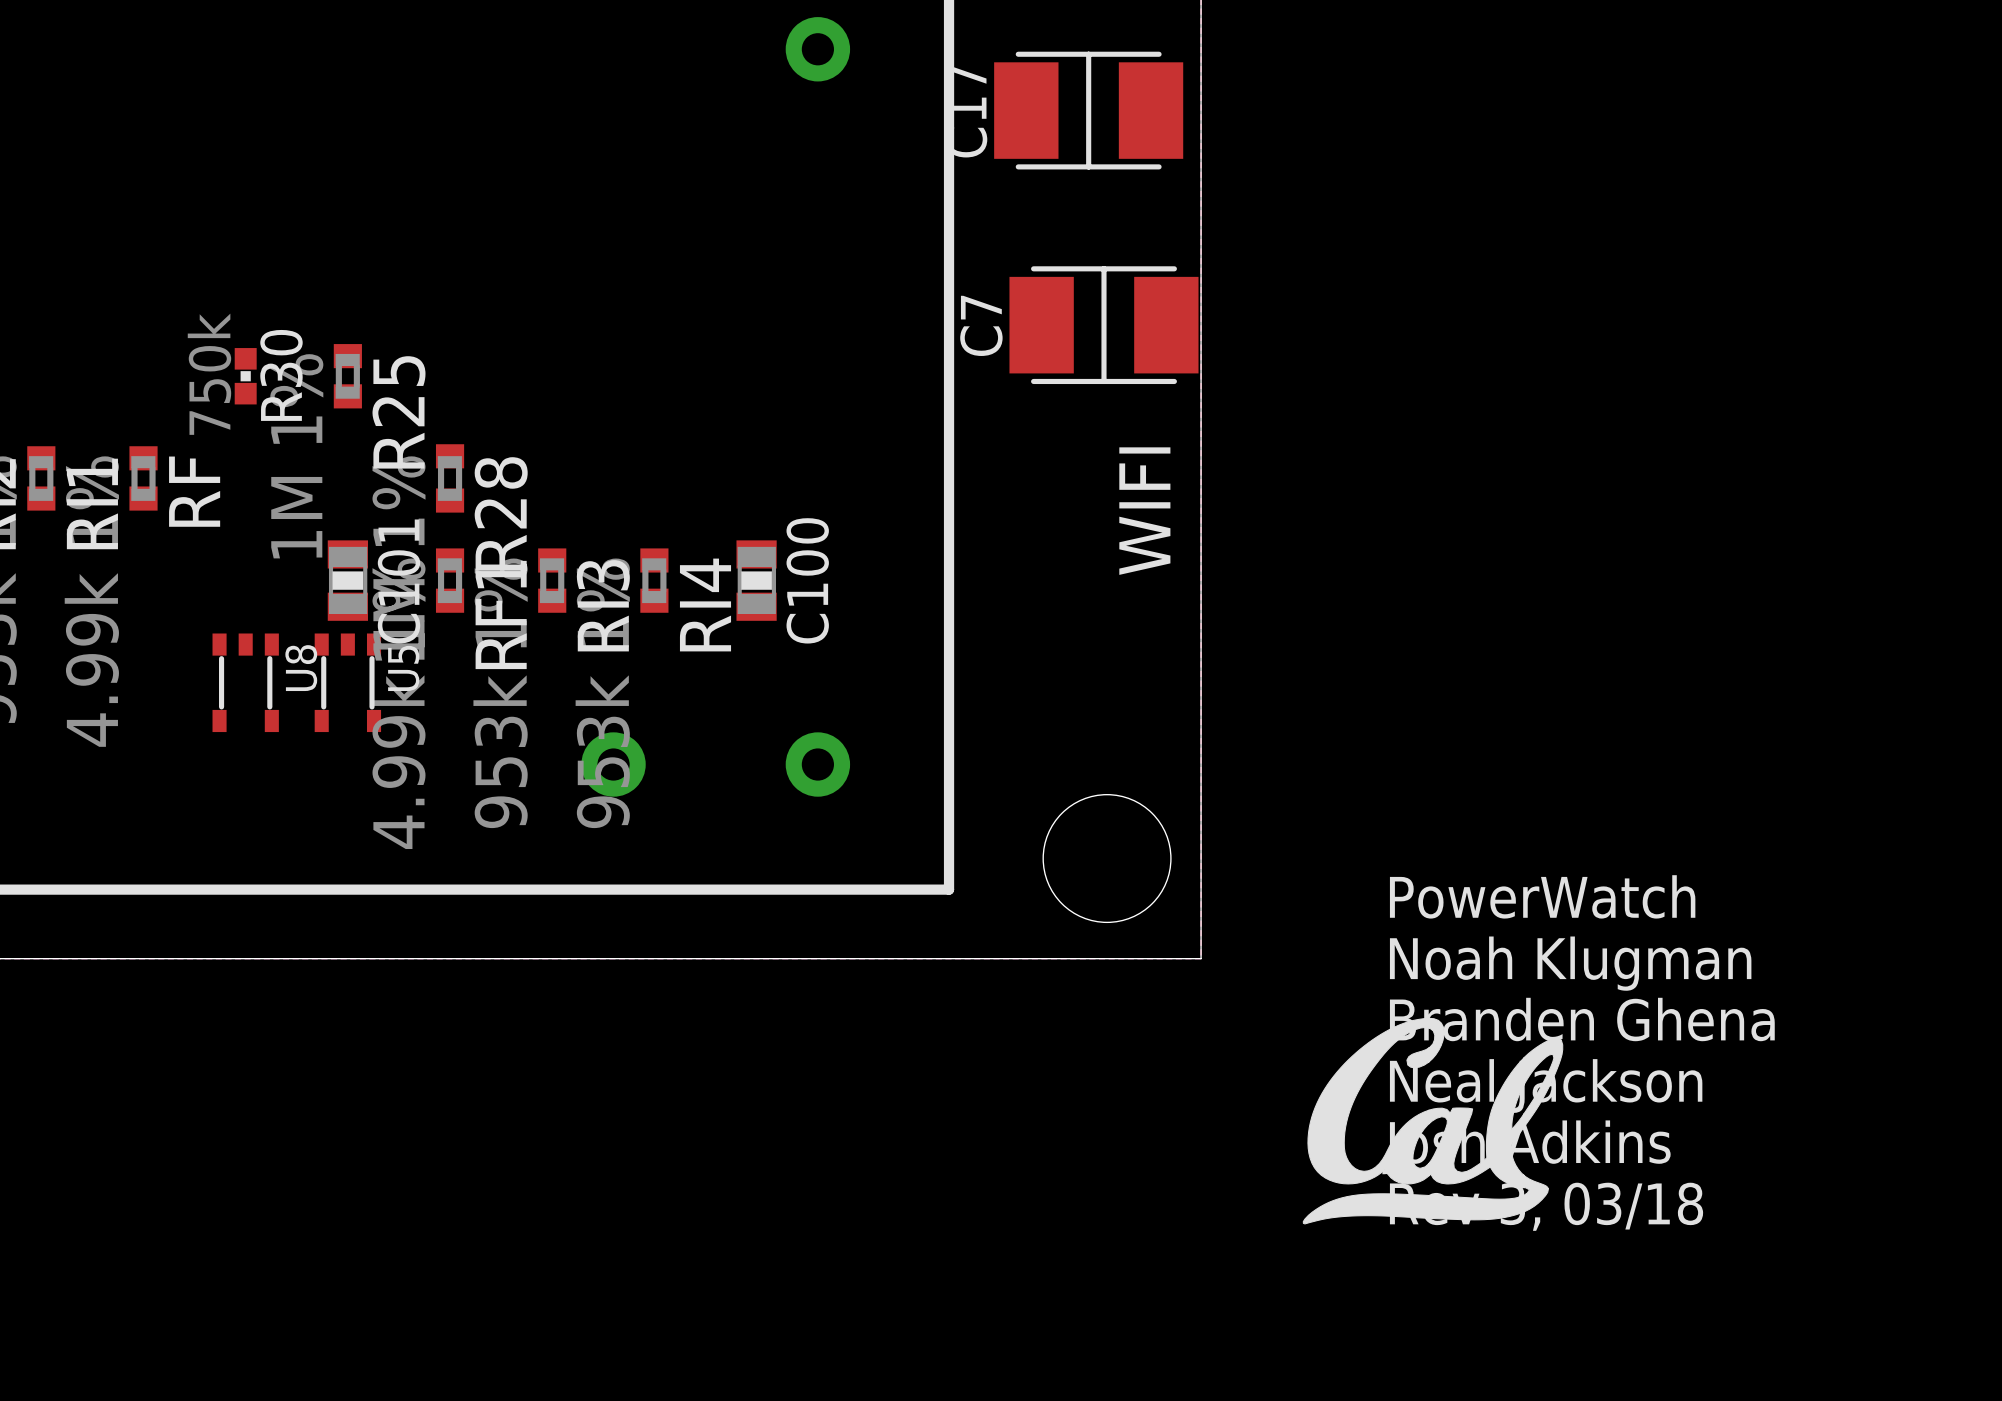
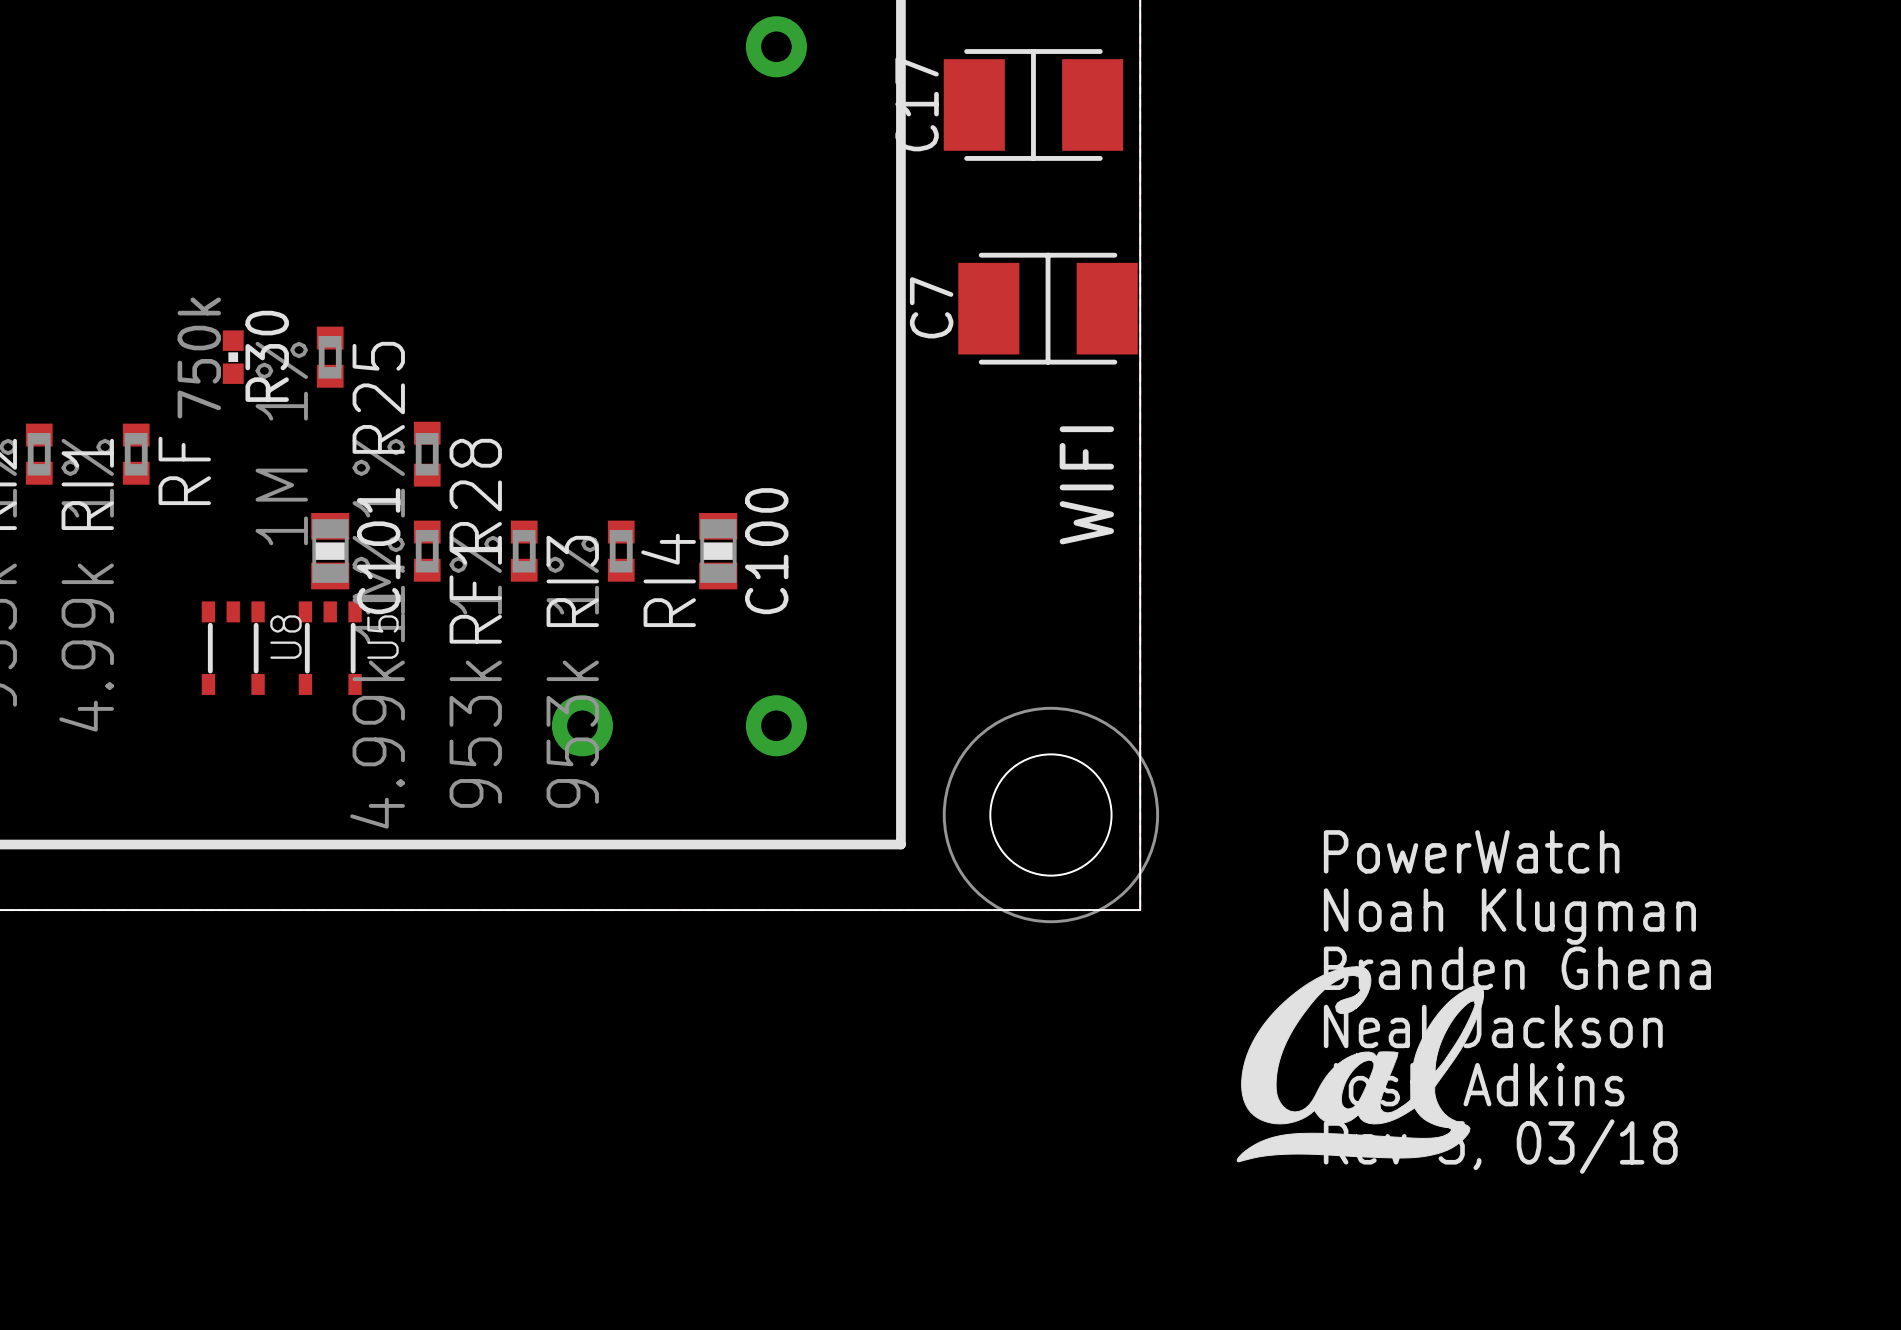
drawing: none -> [942, 706, 1160, 924]

